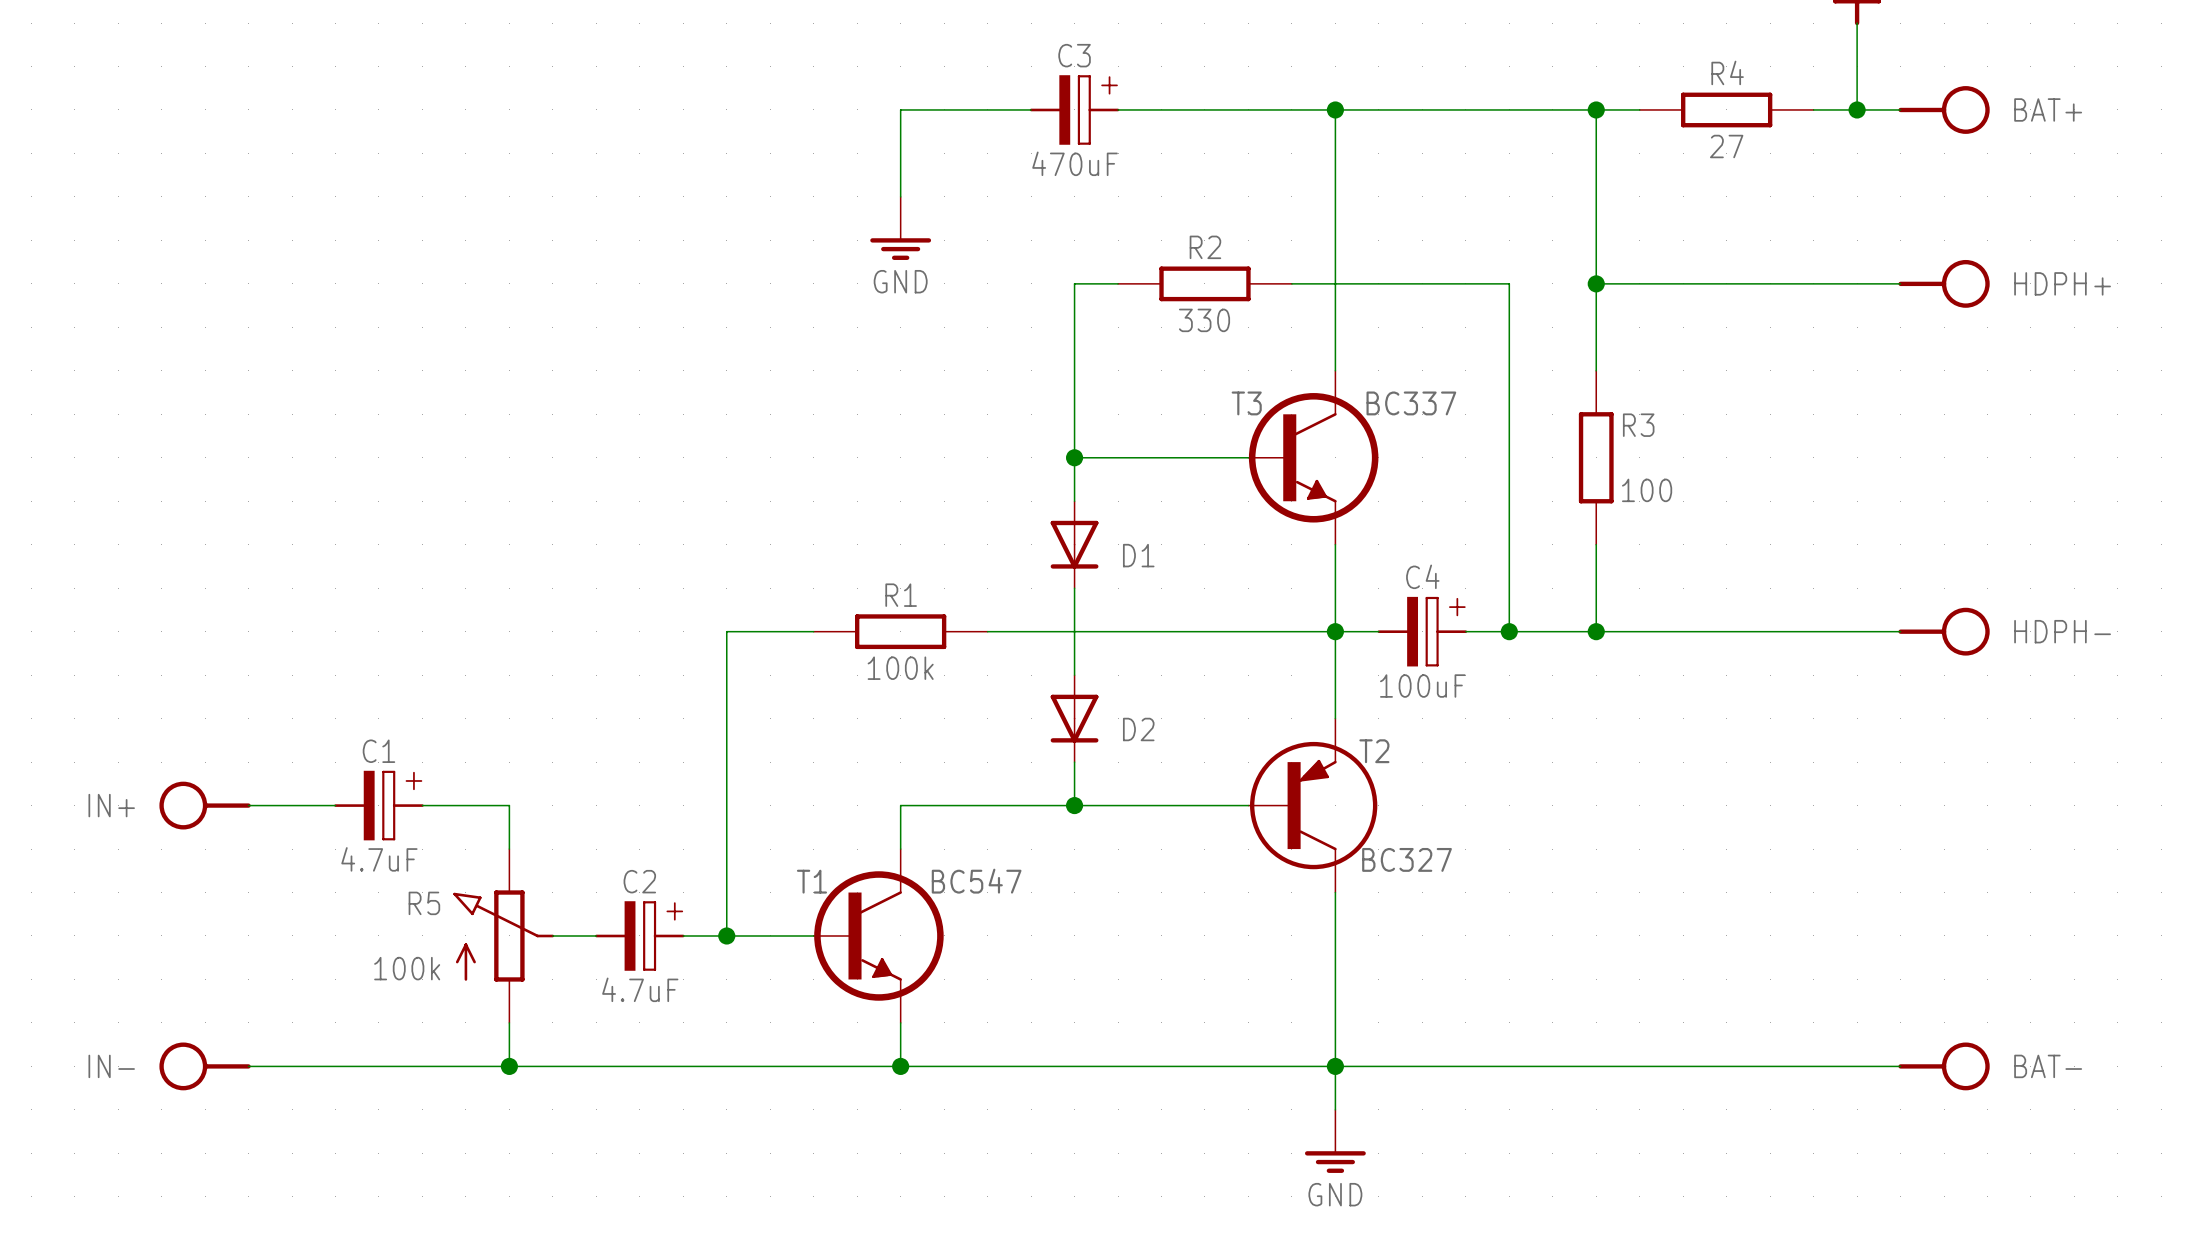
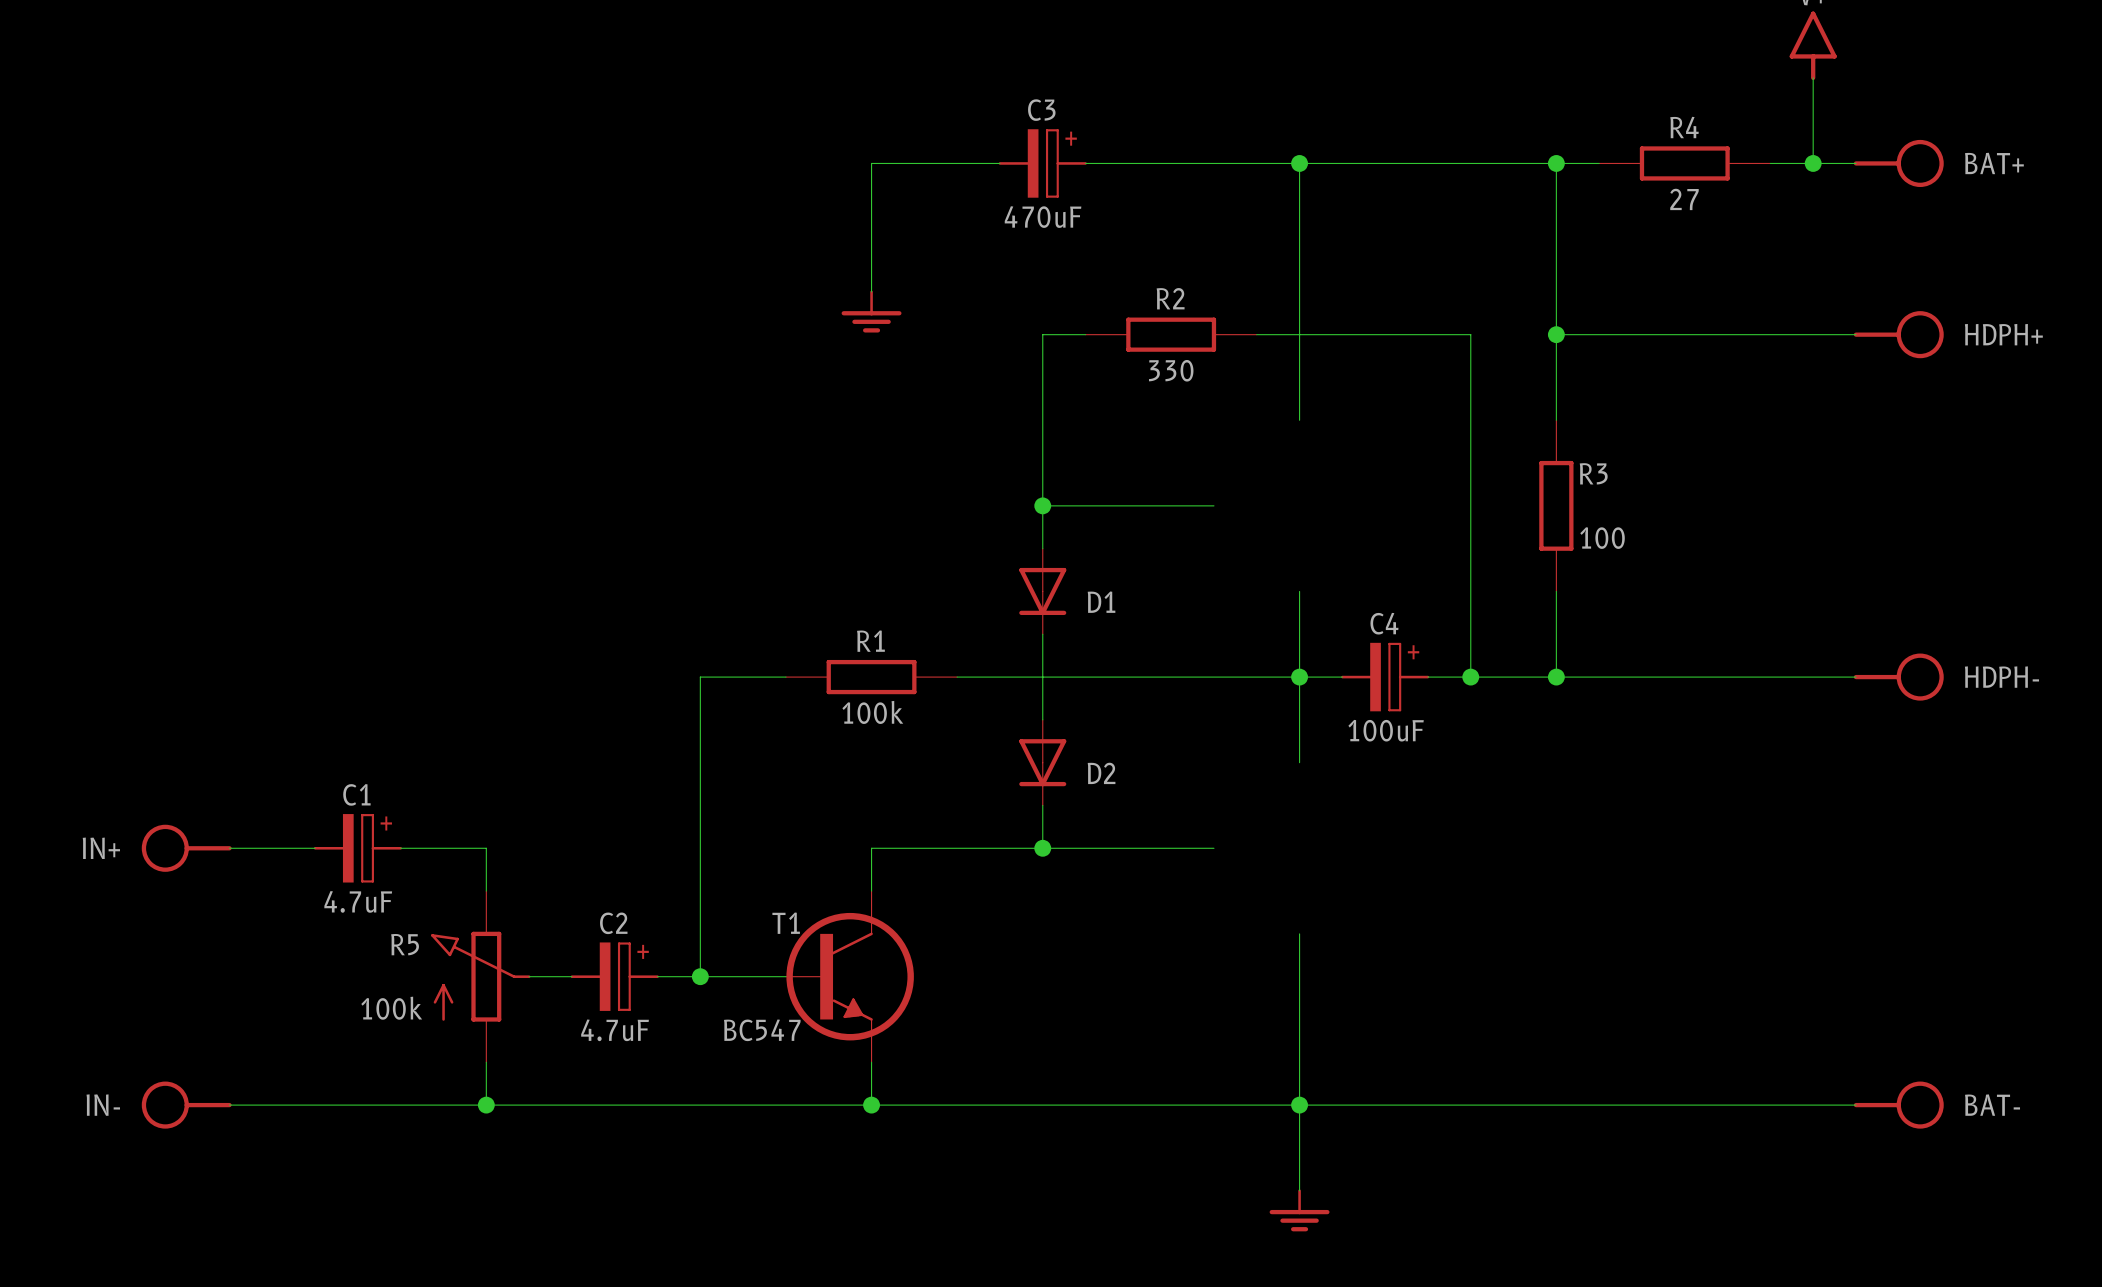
power symbol: GND (900, 228) -> none
power symbol: none -> (871, 311)
T3: BC337 (1313, 457) -> none
T2: BC327 (1312, 805) -> none
T1 value position: BC547 (976, 881) -> BC547 (762, 1030)
power symbol: GND (1335, 1141) -> none
power symbol: none -> (1299, 1210)

